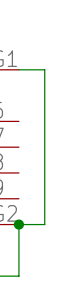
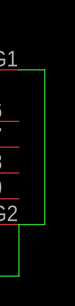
junction: (18, 224) -> none

